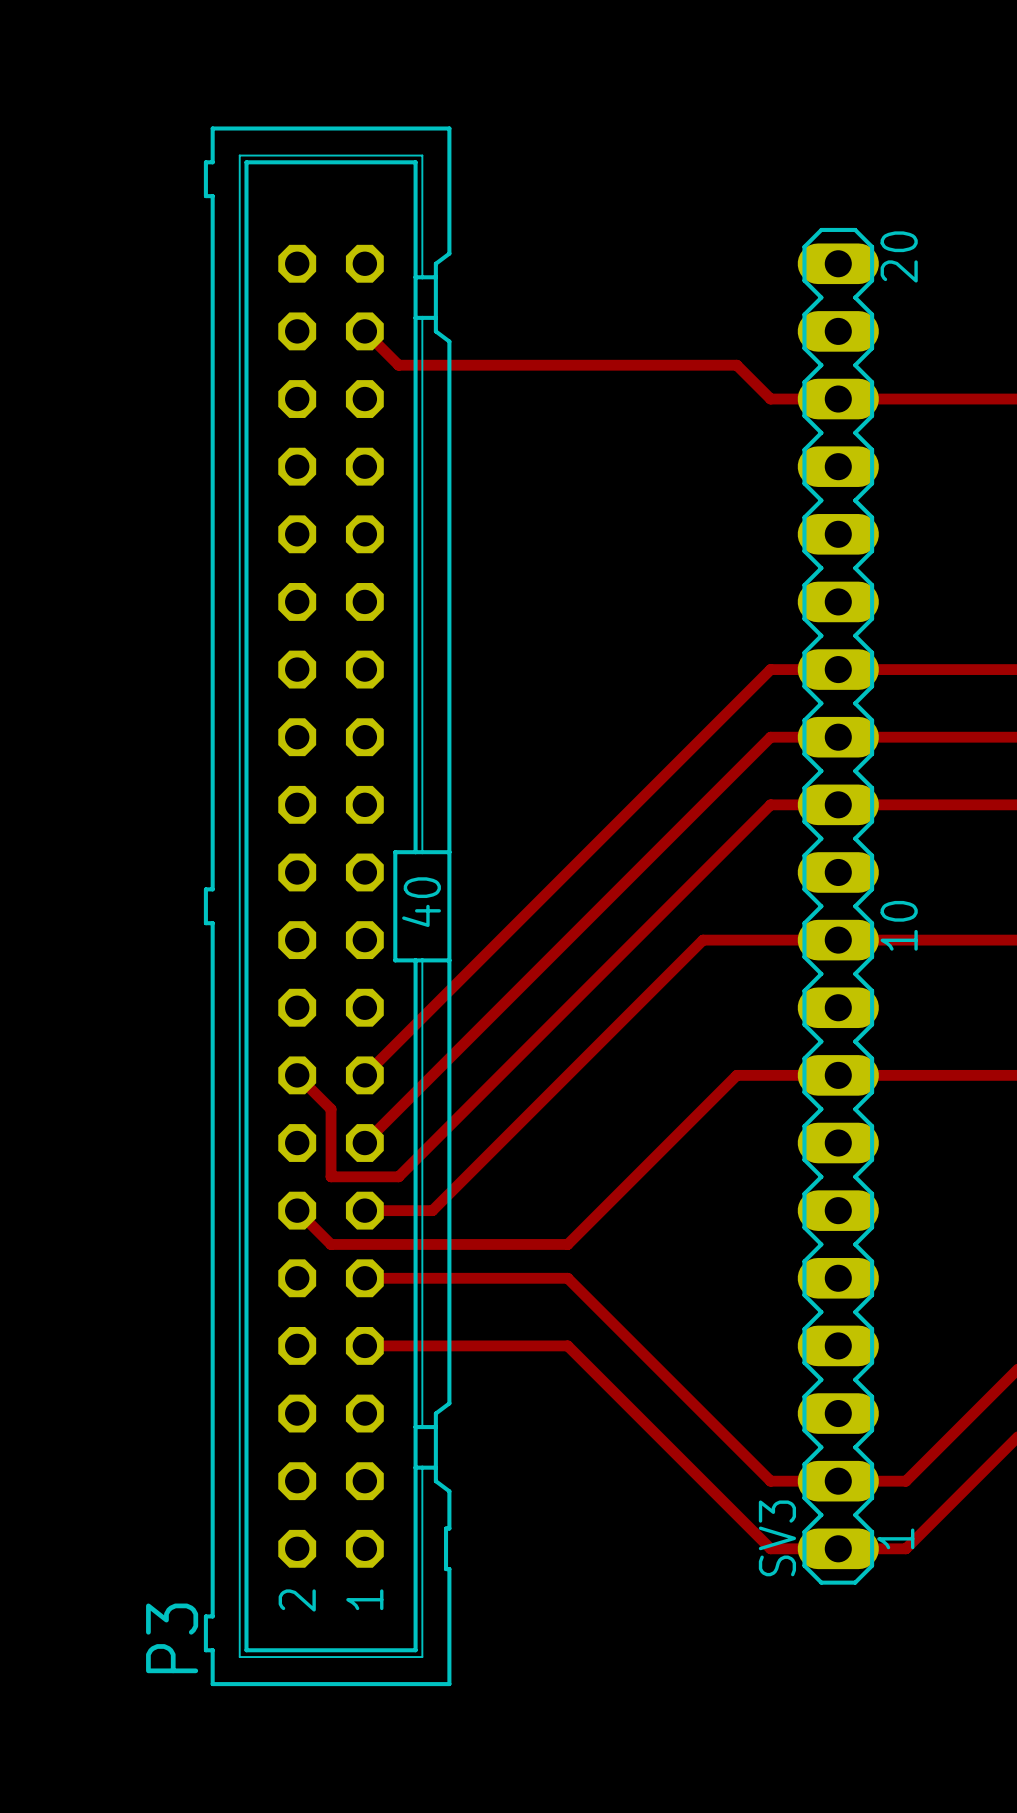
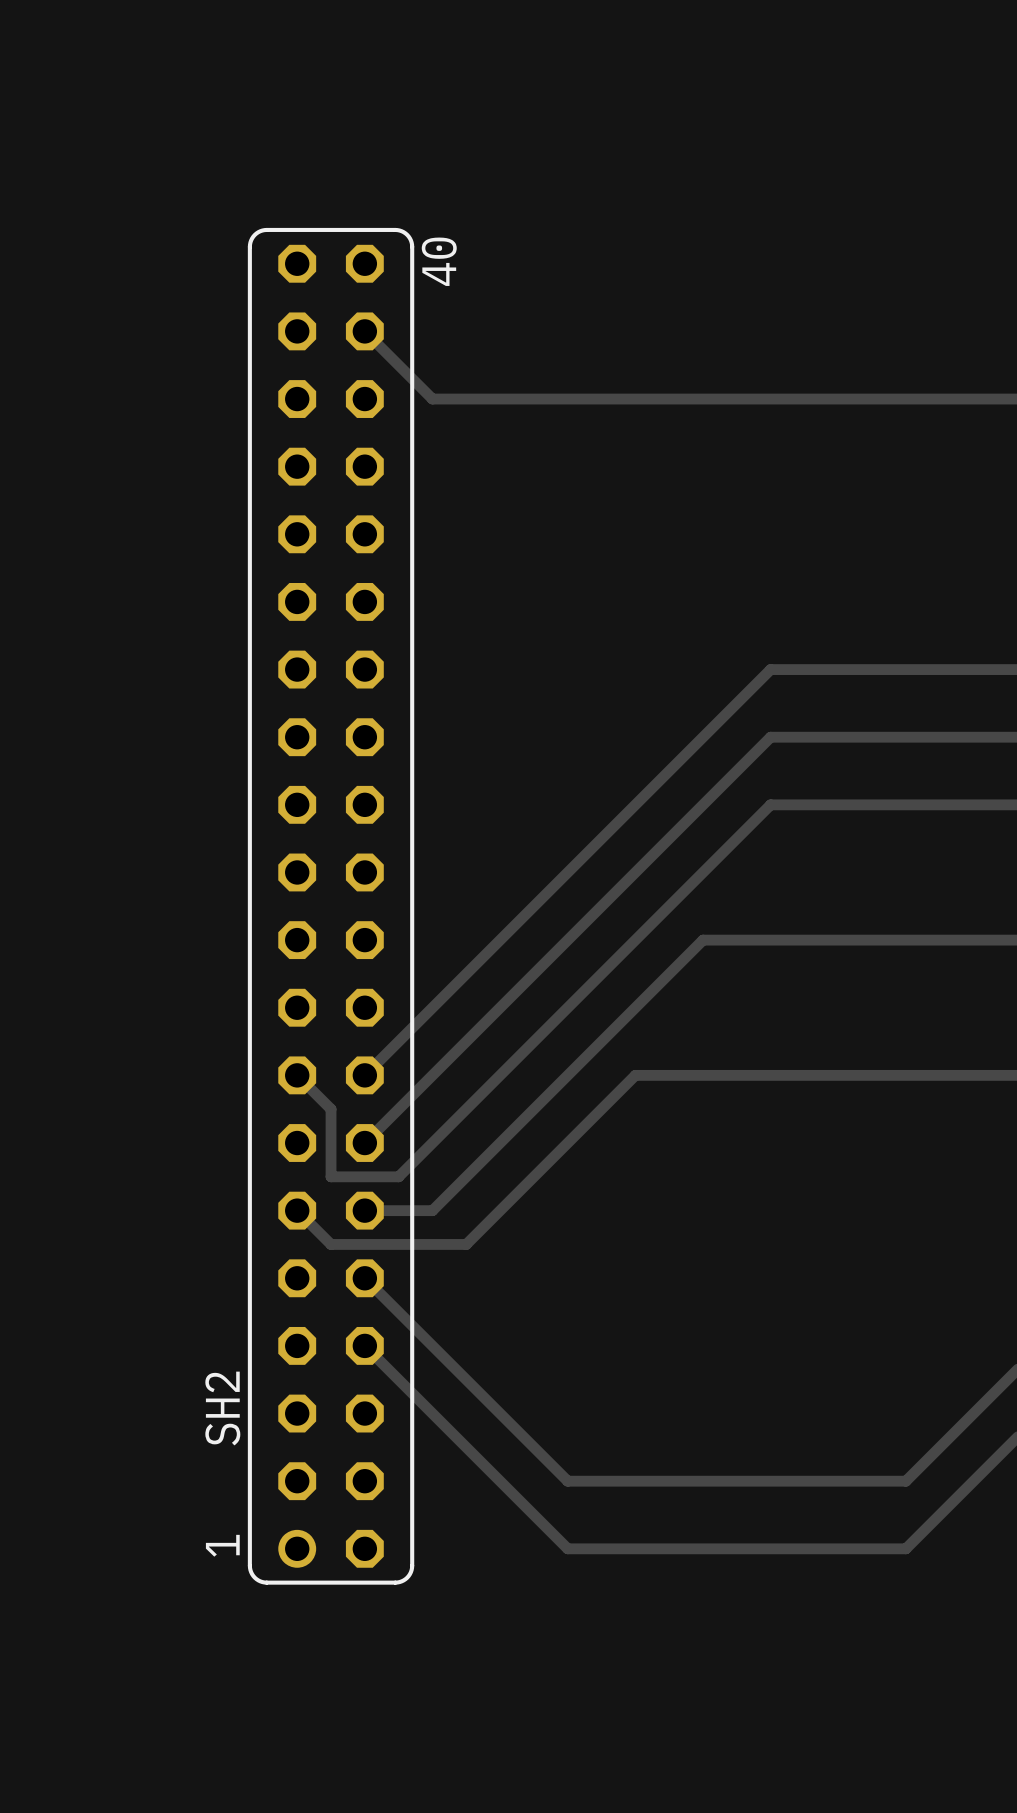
track: (398, 365) (736, 365) (770, 399) -> (398, 365) (432, 399) (770, 399)
P3: (327, 906) -> none
SH2: none -> (331, 906)
SV3: (838, 906) -> none
track: (736, 1075) (567, 1244) (466, 1244) -> (736, 1075) (635, 1075) (466, 1244)
track: (364, 1278) (567, 1278) (770, 1481) -> (364, 1278) (567, 1481) (770, 1481)
track: (364, 1345) (567, 1345) (770, 1548) -> (364, 1345) (567, 1548) (770, 1548)

